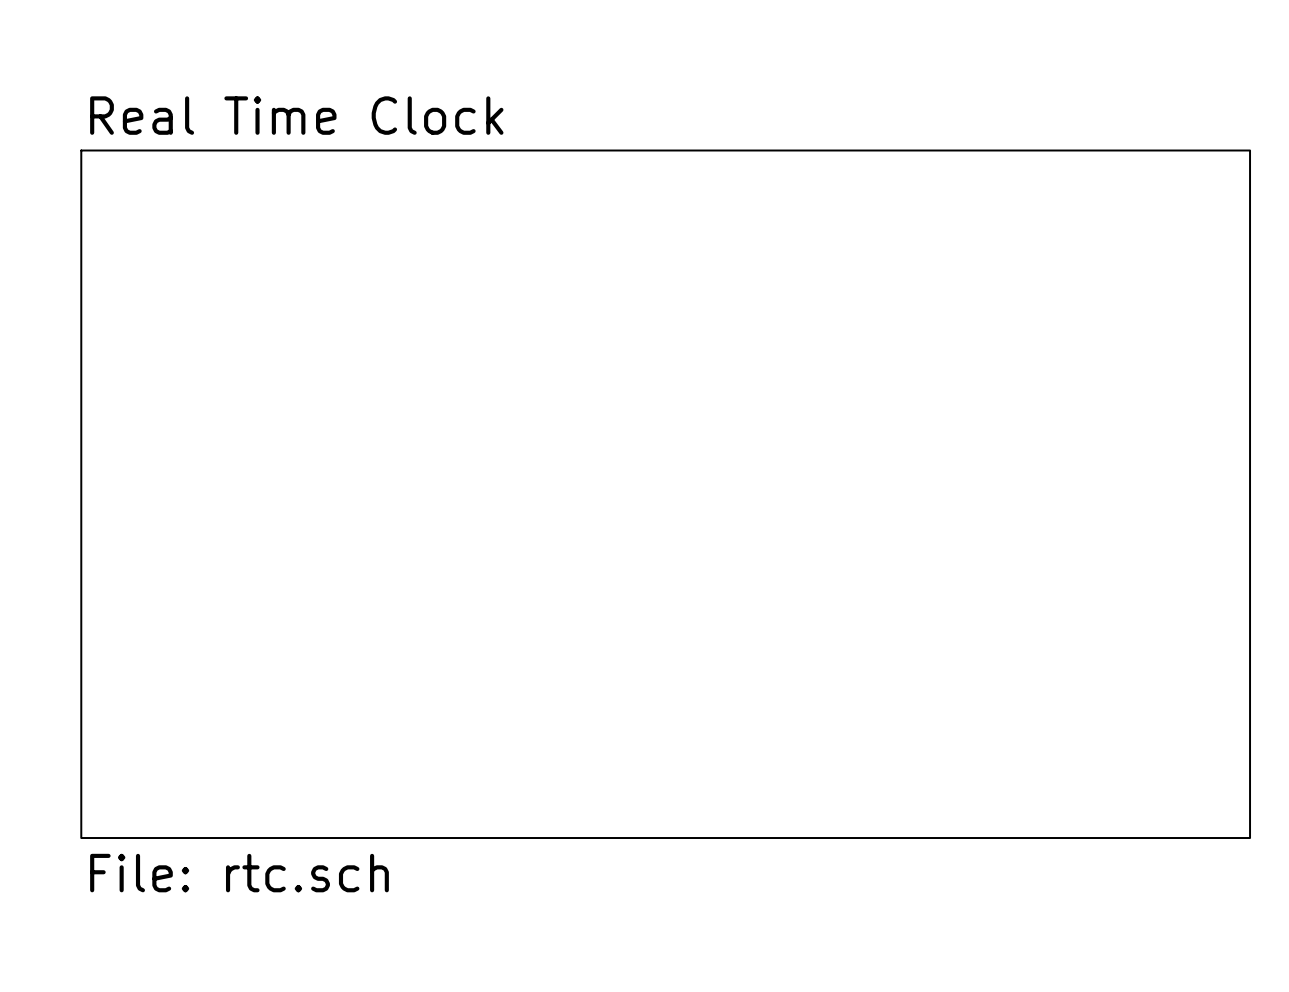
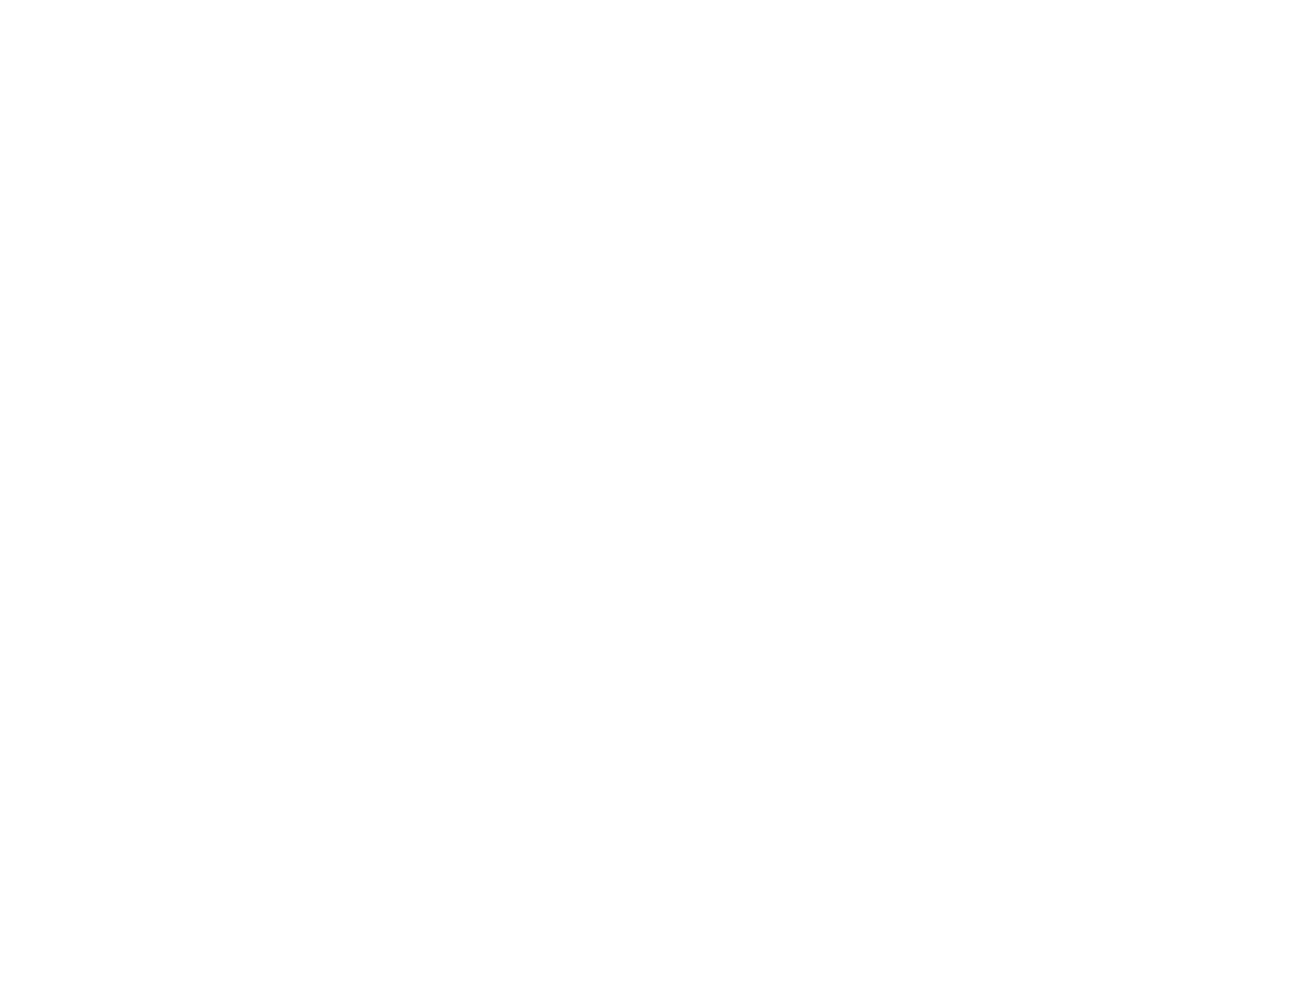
sheet Real Time Clock: File: rtc.sch (665, 494) -> none

